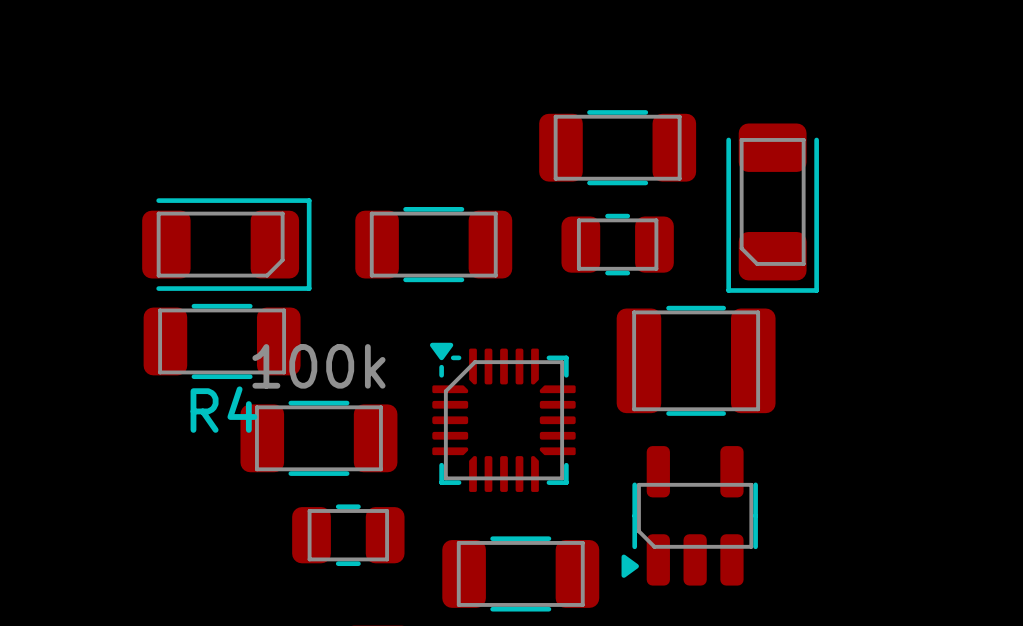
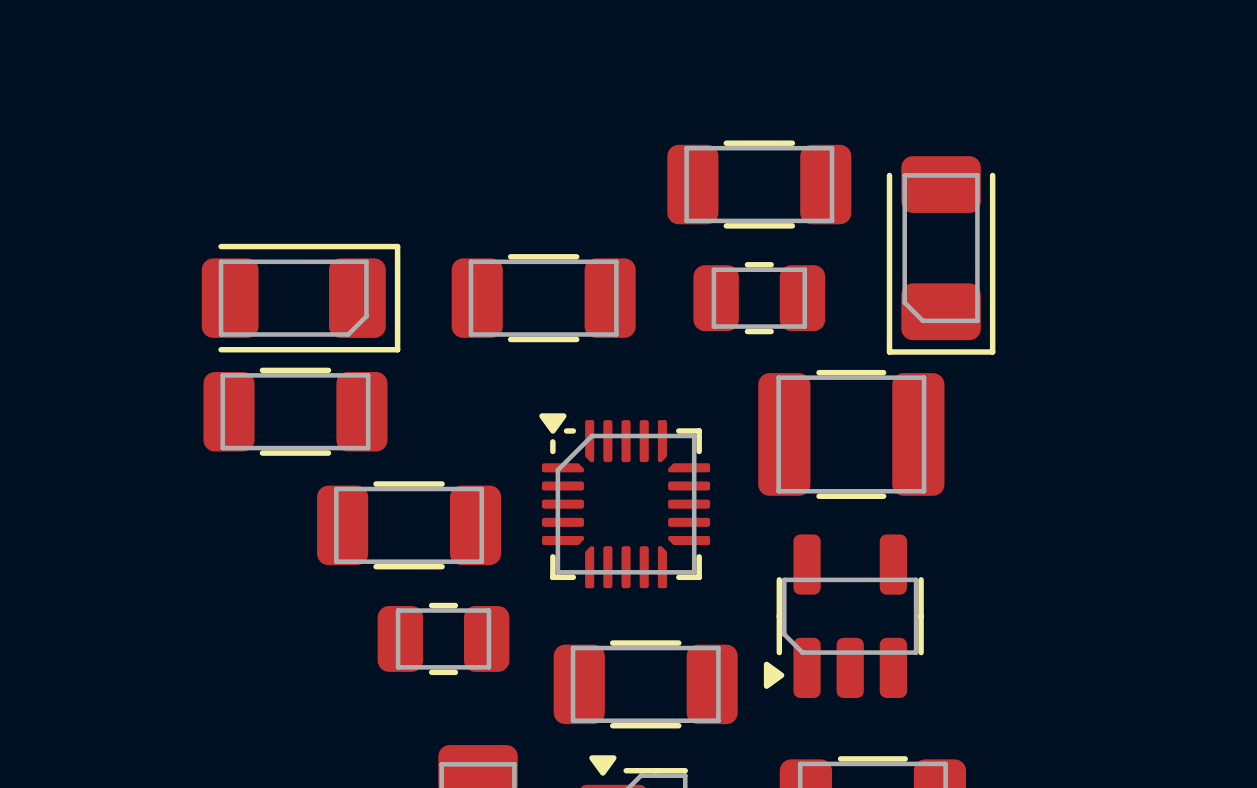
part value: 100k (318, 366) -> none
R4 name: R4 (223, 409) -> none

